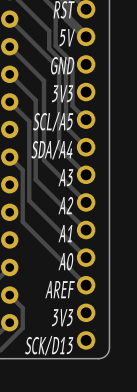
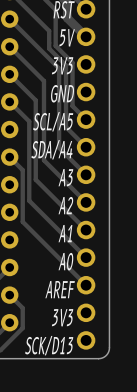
text: GND (62, 65) -> 3V3 (62, 65)
text: 3V3 (62, 93) -> GND (62, 93)

